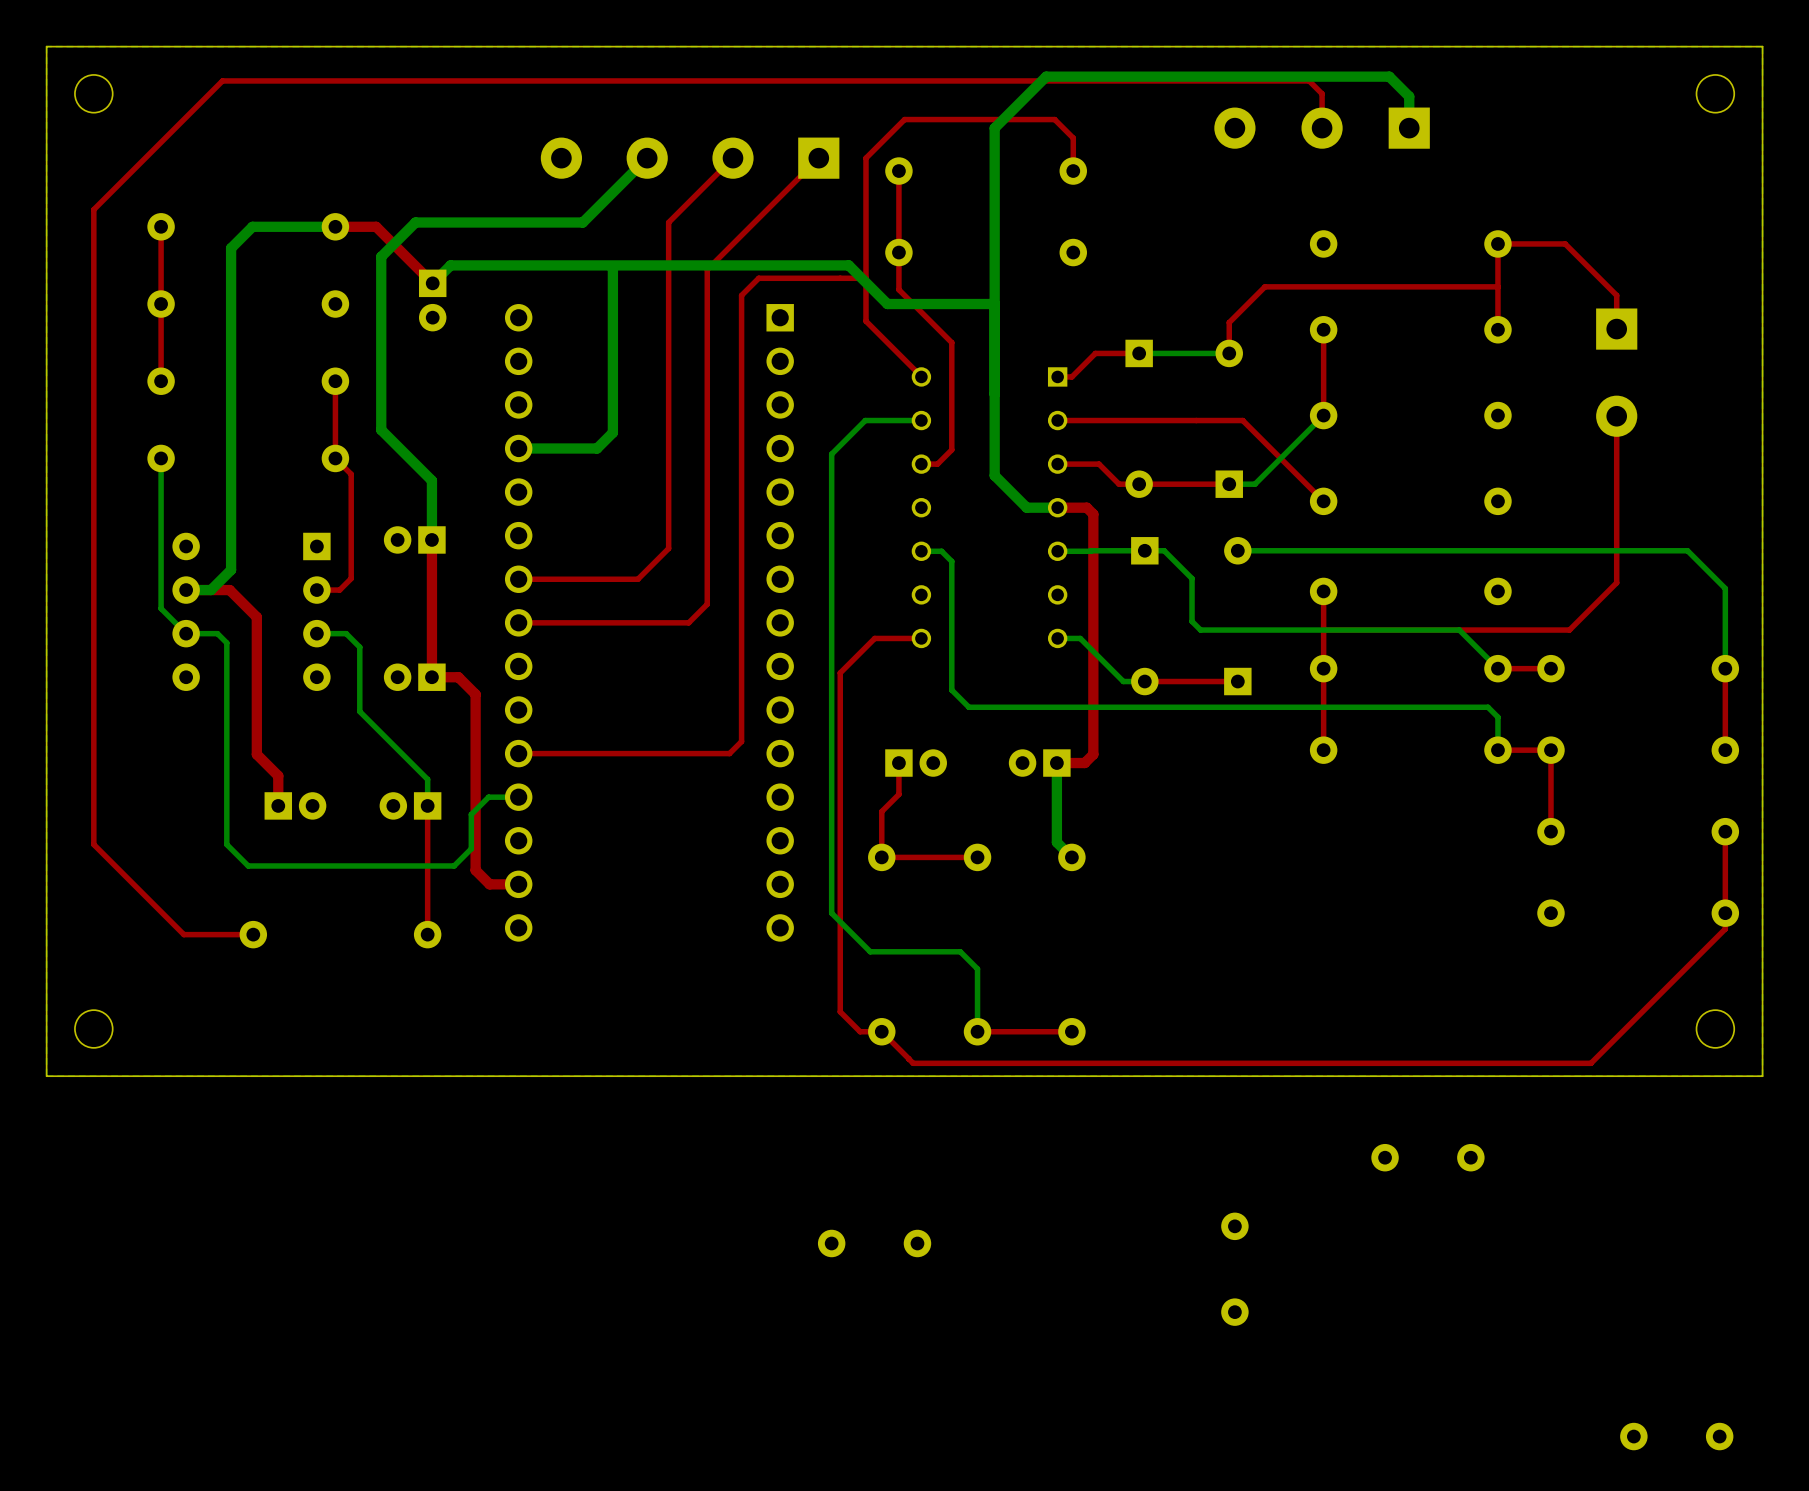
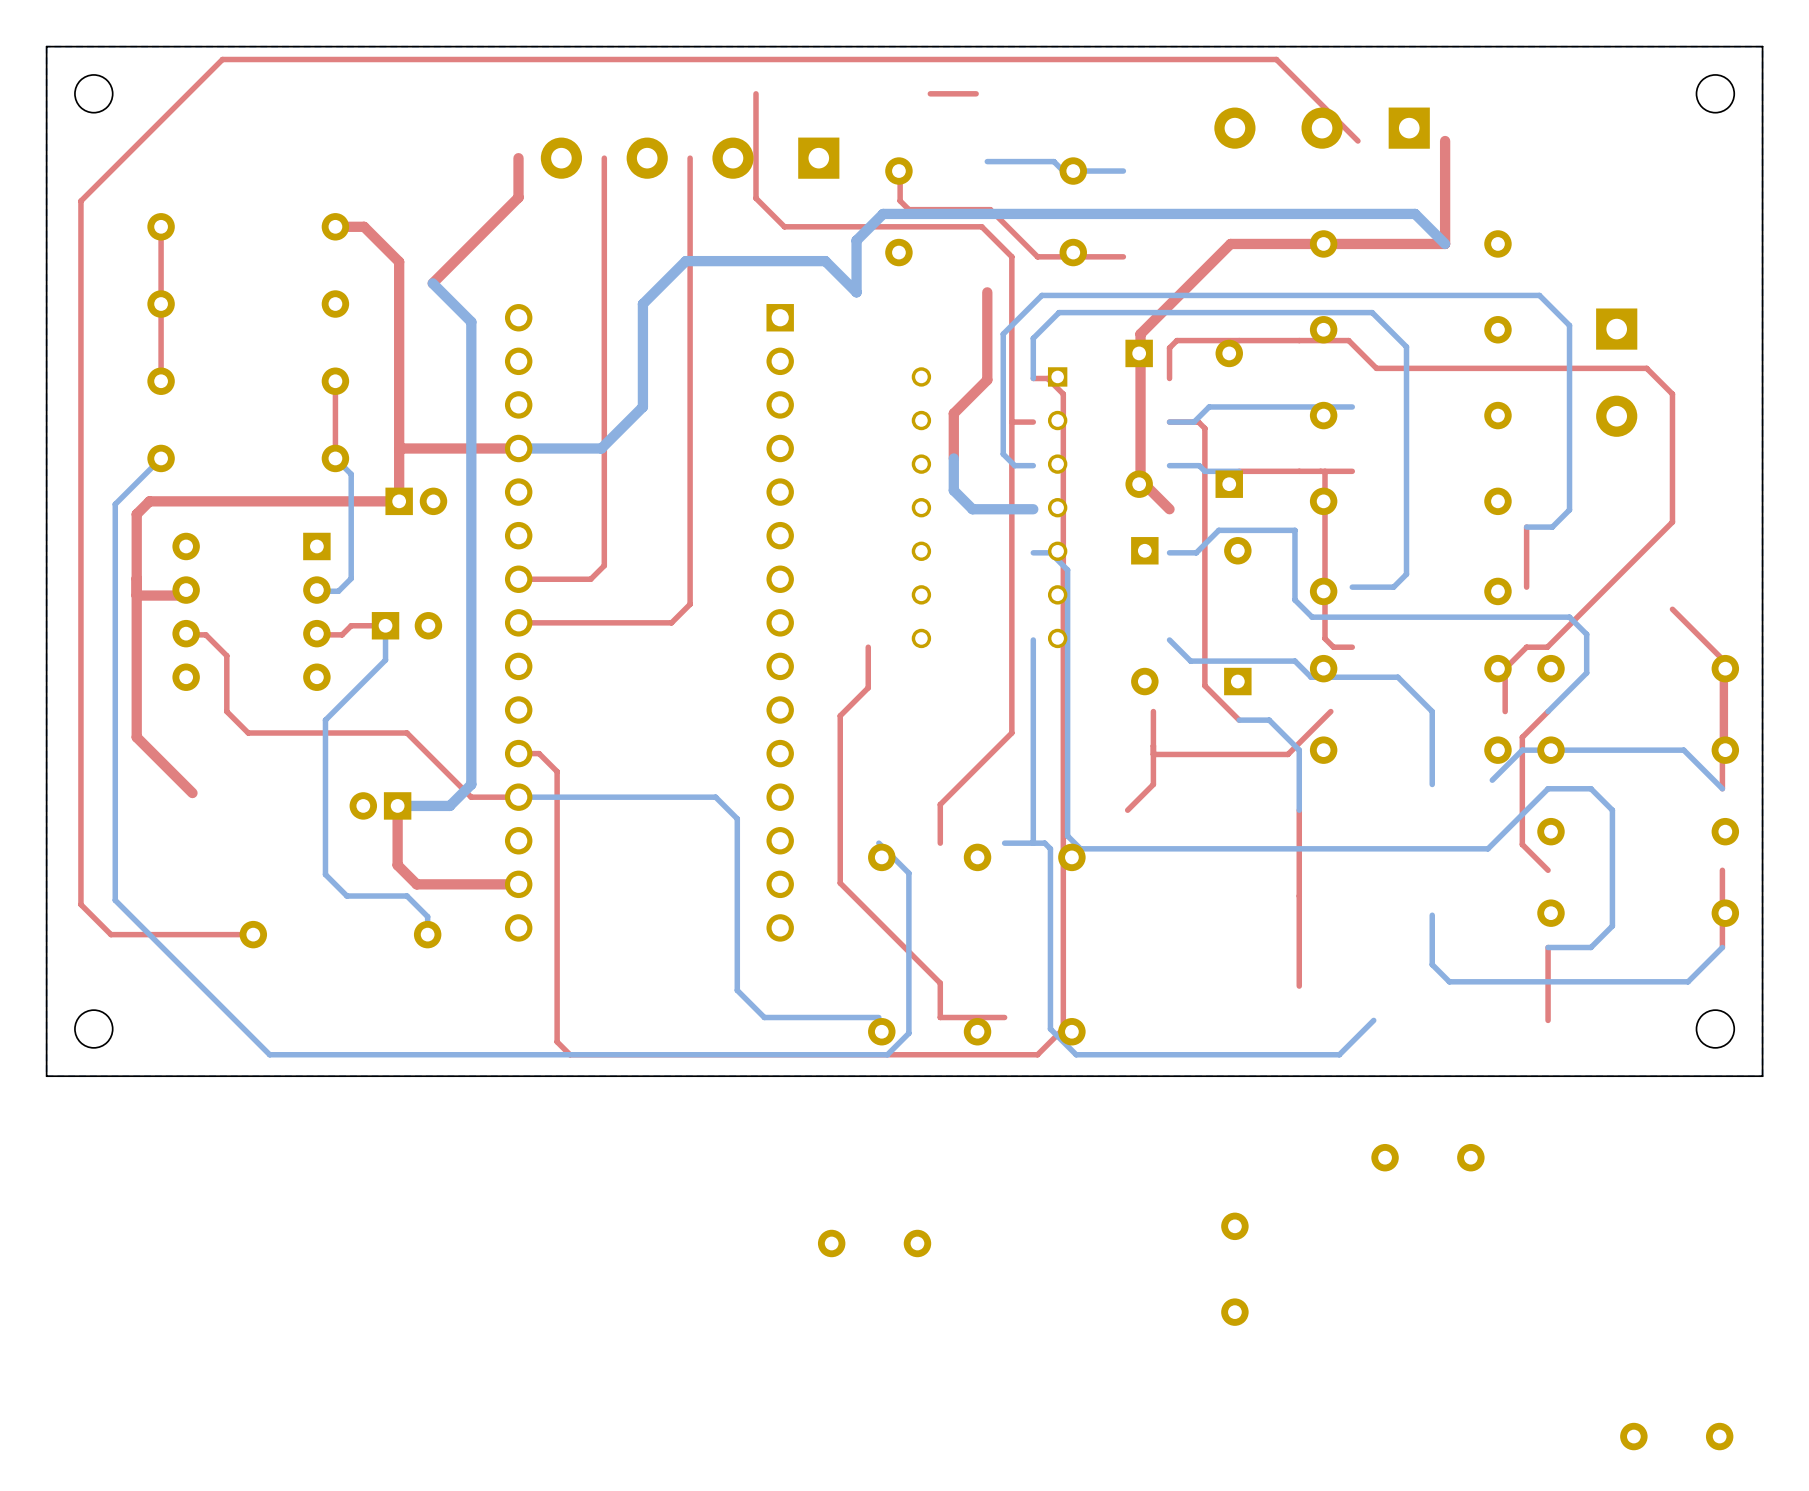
top track: none -> (755, 93) (755, 198) (784, 226) (981, 226) (1011, 256) (1011, 733) (940, 804) (940, 843)
top track: none -> (976, 93) (930, 93)
top track: (1322, 128) (1322, 93) (1309, 80) (222, 80) (93, 209) (93, 844) (183, 934) -> (1357, 141) (1276, 59) (222, 59) (80, 201) (80, 904) (110, 934) (183, 934)
bottom track: (1409, 128) (1409, 96) (1389, 76) (1046, 76) (994, 128) (994, 475) (1026, 507) (1057, 507) -> none
top track: none -> (1445, 141) (1445, 243) (1230, 243) (1140, 334) (1140, 480) (1169, 509)
bottom track: (647, 158) (582, 222) (415, 222) (381, 256) (381, 429) (431, 480) (431, 539) -> none
top track: (733, 158) (668, 222) (668, 548) (637, 579) (590, 579) -> (604, 158) (604, 565) (590, 579)
top track: (818, 158) (707, 269) (707, 604) (688, 622) (671, 622) -> (690, 158) (690, 604) (671, 622)
top track: none -> (900, 161) (900, 200) (908, 209) (990, 209) (1037, 256) (1123, 256)
bottom track: none -> (987, 161) (1053, 161) (1063, 171) (1123, 171)
top track: (898, 171) (898, 289) (951, 342) (951, 449) (937, 464) (921, 464) -> none
top track: (1073, 171) (1073, 138) (1054, 119) (904, 119) (865, 158) (865, 321) (921, 376) -> none
bottom track: (335, 226) (252, 226) (231, 248) (231, 569) (211, 590) (186, 590) -> none
top track: (364, 226) (376, 226) (432, 283) -> (518, 158) (518, 197) (432, 283)
top track: none -> (364, 226) (399, 261) (399, 501) (149, 501) (136, 514) (136, 737) (192, 793)
bottom track: (612, 269) (612, 432) (597, 448) -> (1445, 243) (1415, 213) (883, 213) (856, 240) (856, 292) (825, 261) (685, 261) (642, 304) (642, 406) (601, 448) (597, 448)
top track: (865, 278) (758, 278) (741, 295) (741, 741) (729, 753) (539, 753) -> (1033, 378) (1047, 378) (1063, 394) (1063, 1029) (1037, 1054) (569, 1054) (557, 1041) (557, 771) (539, 753)
bottom track: (432, 283) (450, 265) (848, 265) (887, 304) (994, 304) -> (432, 283) (471, 321) (471, 784) (449, 805) (397, 805)
top track: (1497, 286) (1264, 286) (1229, 322) (1229, 353) -> none
top track: none -> (987, 292) (987, 380) (953, 413) (953, 458)
part: (432, 300) -> none
top track: (1323, 329) (1323, 415) -> none
top track: (1616, 329) (1616, 295) (1565, 243) (1497, 243) (1497, 329) -> none
top track: (1139, 353) (1095, 353) (1071, 376) (1057, 376) -> none
bottom track: (1229, 353) (1139, 353) -> none
bottom track: none -> (1033, 378) (1033, 338) (1059, 312) (1372, 312) (1406, 346) (1406, 574) (1393, 587) (1352, 587)
top track: none -> (1169, 378) (1169, 347) (1176, 340) (1348, 340) (1376, 368) (1646, 368) (1672, 394) (1672, 522) (1547, 647) (1526, 647) (1505, 668) (1505, 711)
bottom track: none -> (1352, 406) (1209, 406) (1194, 422) (1169, 422)
bottom track: (1323, 415) (1254, 484) (1229, 484) -> none
top track: (1616, 416) (1616, 582) (1569, 630) (1323, 630) -> none
bottom track: (921, 420) (865, 420) (831, 454) (831, 913) (870, 951) (960, 951) (977, 968) (977, 1031) -> none
top track: (1057, 420) (1242, 420) (1323, 501) -> none
top track: none -> (1033, 422) (1011, 422)
top track: none -> (1169, 422) (1198, 422) (1204, 428) (1204, 685) (1239, 720)
top track: none -> (518, 448) (399, 449)
bottom track: (161, 458) (161, 608) (186, 633) (217, 633) (226, 642) (226, 844) (248, 865) (454, 865) (471, 848) (471, 814) (488, 797) (518, 797) -> (161, 458) (115, 504) (115, 900) (269, 1054) (887, 1054) (908, 1033) (908, 873) (878, 843)
bottom track: none -> (335, 458) (351, 474) (351, 578) (338, 591) (309, 591)
top track: (335, 458) (351, 474) (351, 578) (339, 590) (316, 590) -> none
bottom track: none -> (953, 458) (953, 490) (972, 509) (1033, 509)
top track: (1057, 464) (1099, 464) (1119, 484) (1229, 484) -> none
bottom track: none -> (1033, 465) (1014, 465) (1003, 454) (1003, 334) (1041, 295) (1539, 295) (1569, 325) (1569, 509) (1552, 527) (1526, 527)
bottom track: none -> (1169, 465) (1199, 465) (1204, 471) (1239, 471)
top track: none -> (1325, 471) (1325, 638) (1333, 647) (1352, 647)
top track: none -> (1352, 471) (1239, 471)
top track: (1057, 507) (1086, 507) (1093, 514) (1093, 754) (1084, 763) (1056, 763) -> none
top track: none -> (1526, 527) (1526, 587)
part rotation: 0° (414, 539) -> 180° (416, 501)
part position: (414, 539) -> (416, 501)
top track: (431, 539) (431, 677) (458, 677) (475, 694) (475, 870) (489, 884) -> (397, 805) (397, 865) (416, 884) (489, 884)
bottom track: (1237, 550) (1687, 550) (1725, 588) (1725, 668) -> none
bottom track: (921, 551) (941, 551) (951, 561) (951, 690) (968, 707) (1488, 707) (1497, 717) (1497, 750) -> none
bottom track: (1057, 551) (1164, 550) (1192, 578) (1192, 621) (1200, 630) (1459, 630) (1497, 668) -> none
bottom track: none -> (1033, 552) (1050, 552) (1067, 569) (1067, 835) (1080, 848) (1488, 848) (1548, 788) (1590, 788) (1612, 810) (1612, 926) (1590, 947) (1548, 947)
bottom track: none -> (1169, 552) (1196, 552) (1218, 530) (1294, 530) (1294, 600) (1312, 617) (1569, 617) (1586, 634) (1586, 672) (1548, 711)
top track: (186, 590) (229, 590) (256, 617) (256, 754) (278, 775) (278, 805) -> none
top track: (1323, 591) (1323, 750) -> none
top track: none -> (178, 595) (136, 595)
top track: none -> (1672, 609) (1722, 659) (1722, 788)
bottom track: none -> (385, 625) (385, 660) (325, 720) (325, 874) (346, 896) (406, 896) (427, 916) (427, 934)
top track: none -> (385, 625) (351, 625) (342, 634) (309, 634)
part: none -> (406, 625)
bottom track: (316, 633) (346, 633) (359, 647) (359, 711) (427, 779) (427, 805) -> none
top track: none -> (178, 634) (205, 634) (226, 655) (226, 711) (248, 733) (406, 733) (471, 797) (518, 797)
top track: (921, 638) (874, 638) (840, 672) (840, 715) -> (868, 647) (868, 687) (840, 715)
bottom track: (1057, 638) (1080, 638) (1123, 681) (1144, 681) -> none
bottom track: none -> (1033, 640) (1033, 843)
bottom track: none -> (1169, 640) (1190, 661) (1294, 661) (1311, 677) (1397, 677) (1432, 711) (1432, 784)
top track: (1550, 668) (1497, 668) -> none
part: (414, 677) -> none
top track: (1237, 681) (1144, 681) -> none
top track: none -> (1153, 711) (1153, 784) (1127, 810)
top track: none -> (1330, 711) (1287, 754) (1153, 754)
top track: none -> (1548, 711) (1522, 737) (1522, 844) (1548, 870)
bottom track: none -> (1239, 720) (1269, 720) (1299, 750) (1299, 810)
top track: (1497, 750) (1550, 750) (1550, 831) -> none
top track: (898, 763) (898, 794) (881, 811) (881, 857) (977, 857) -> none
part: (916, 763) -> none
part: (1039, 763) -> none
bottom track: (1056, 763) (1056, 842) (1071, 857) -> none
bottom track: none -> (1492, 780) (1522, 750) (1683, 750) (1722, 788)
bottom track: none -> (518, 797) (715, 797) (737, 818) (737, 990) (764, 1017) (878, 1017)
part: (295, 805) -> none
part position: (410, 805) -> (380, 805)
top track: (427, 805) (427, 934) -> none
top track: none -> (1299, 810) (1299, 986)
top track: (1725, 831) (1725, 928) (1590, 1063) (913, 1063) (908, 1059) -> none
bottom track: none -> (1004, 843) (1044, 843) (1050, 848) (1050, 1029) (1076, 1054) (1339, 1054) (1373, 1020)
top track: none -> (1722, 870) (1722, 947)
top track: (840, 883) (840, 1011) (860, 1031) (881, 1031) (908, 1058) -> (840, 883) (940, 983) (940, 1017) (1004, 1017)
bottom track: none -> (1432, 915) (1432, 964) (1449, 981) (1688, 981) (1722, 947)
top track: none -> (1548, 947) (1548, 1020)
top track: (1071, 1031) (977, 1031) -> none

